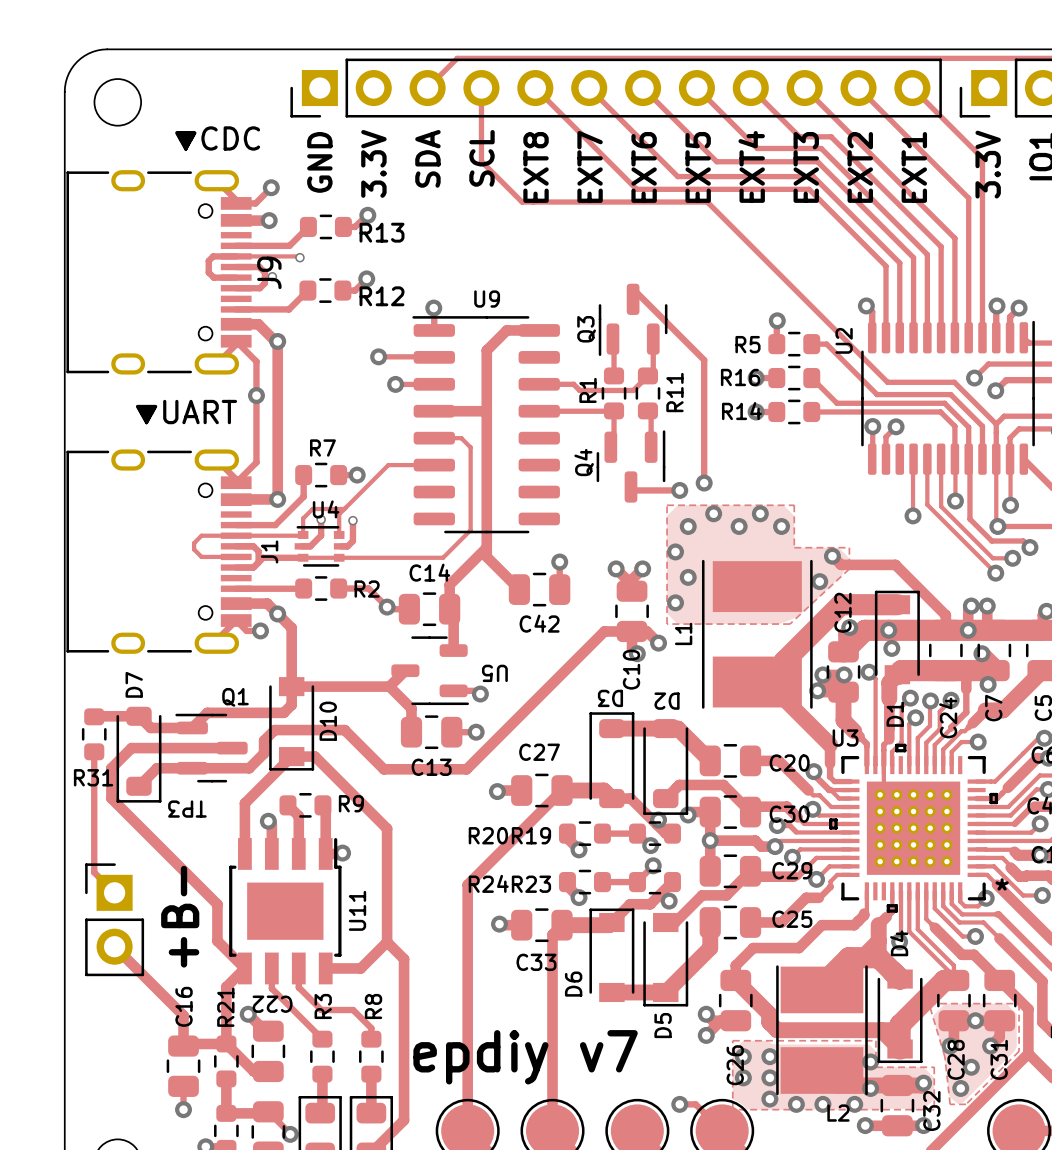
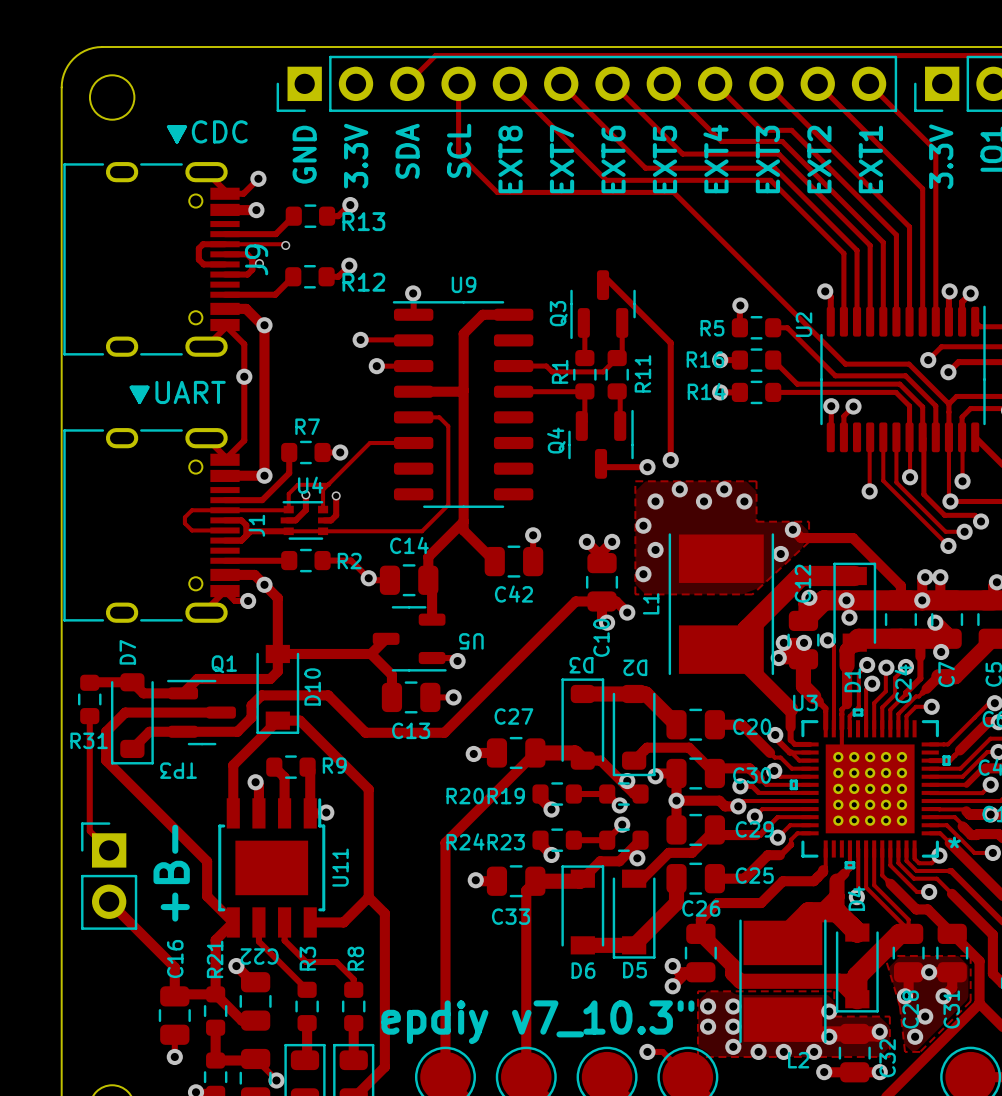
D6 name rotation: 0° (573, 984) -> 90° clockwise (583, 970)
D6 name position: D6 (573, 984) -> D6 (583, 970)
D5 name rotation: 0° (663, 1025) -> 90° clockwise (634, 970)
text: epdiy v7 (525, 1057) -> epdiy v7_10.3" (537, 1022)
C26 name rotation: 0° (735, 1065) -> 90° clockwise (701, 908)
C26 name position: C26 (735, 1065) -> C26 (701, 908)

